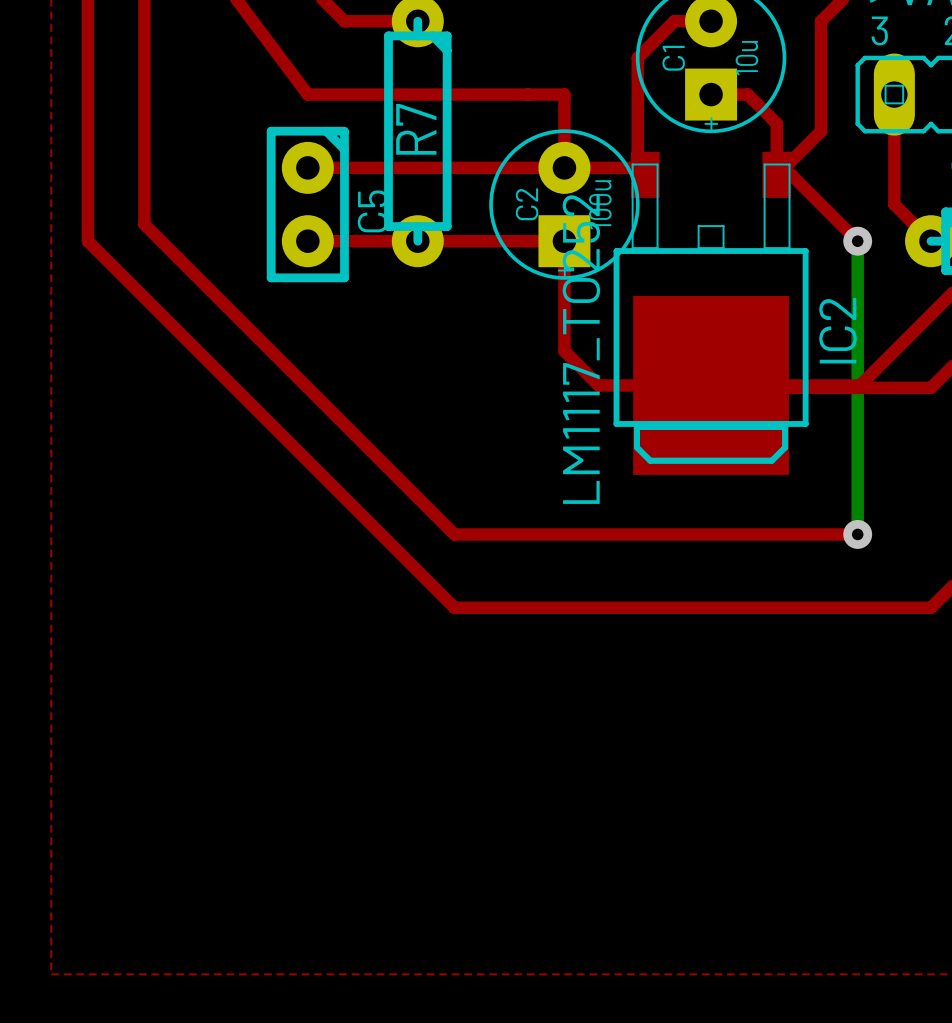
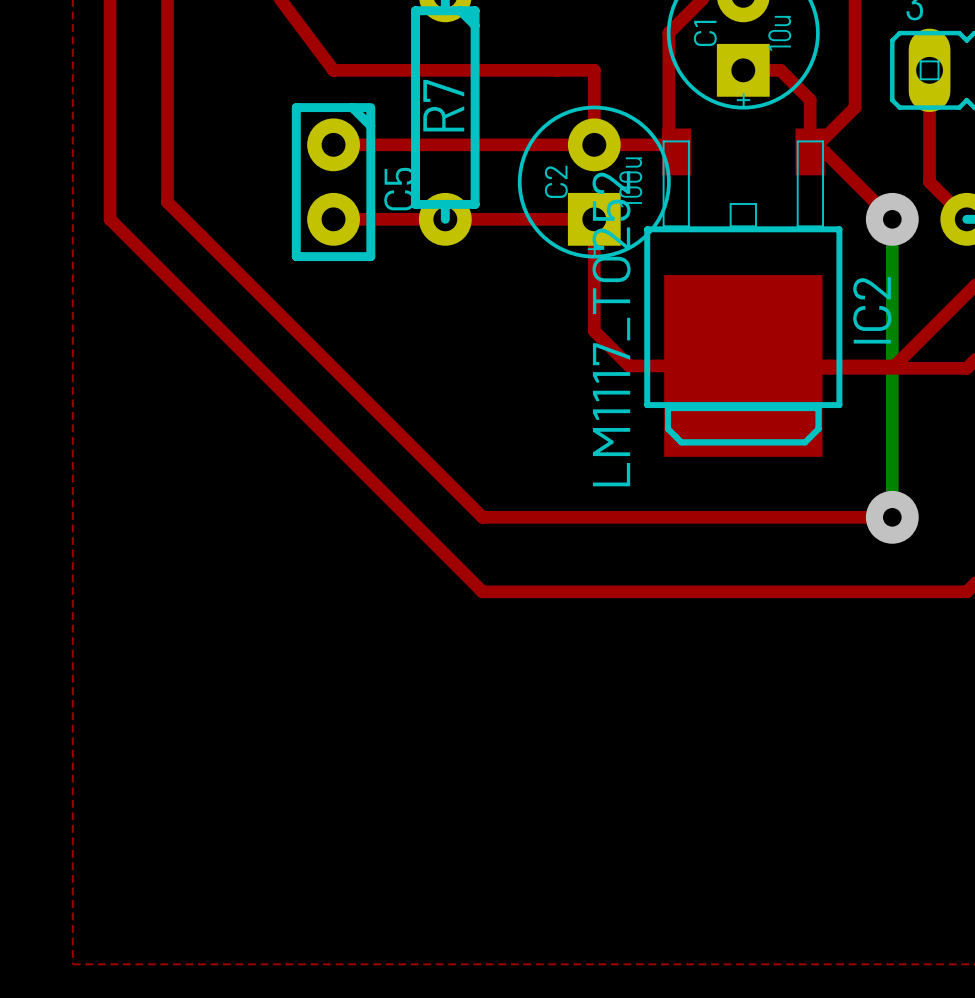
via size: [843, 226, 873, 256] -> [865, 192, 919, 246]
via size: [843, 520, 873, 549] -> [865, 490, 919, 544]

